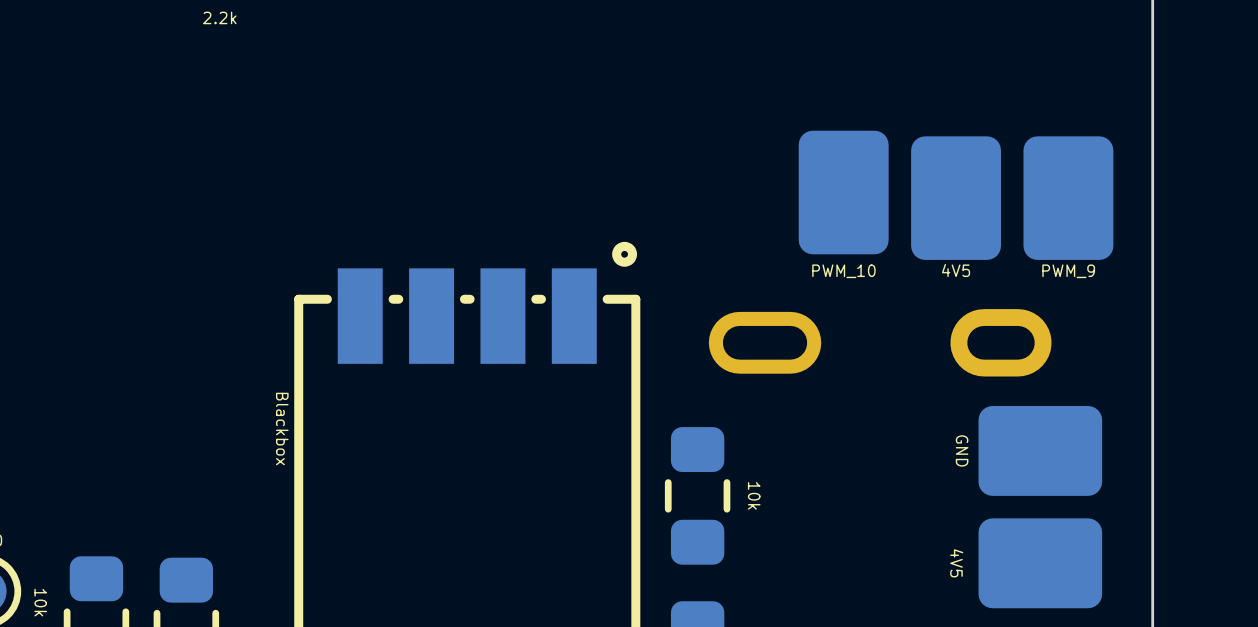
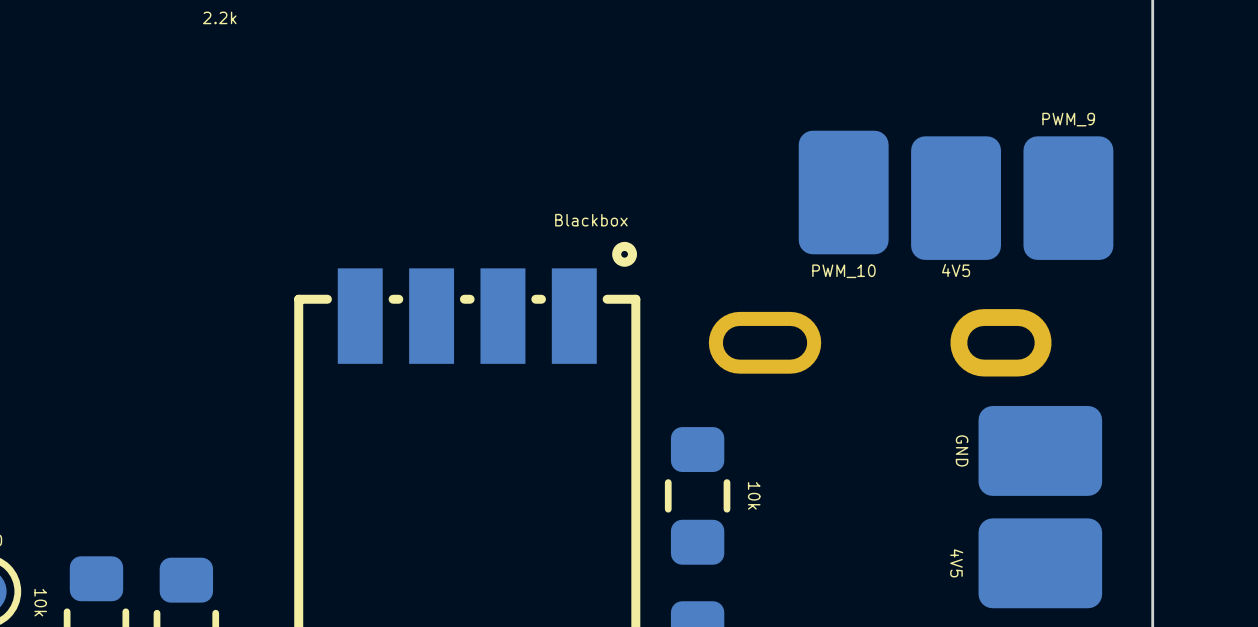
PWM_9 name position: PWM_9 (1068, 271) -> PWM_9 (1068, 119)
Blackbox name rotation: 0° (282, 429) -> 90° counterclockwise (591, 220)
Blackbox name position: Blackbox (282, 429) -> Blackbox (591, 220)

